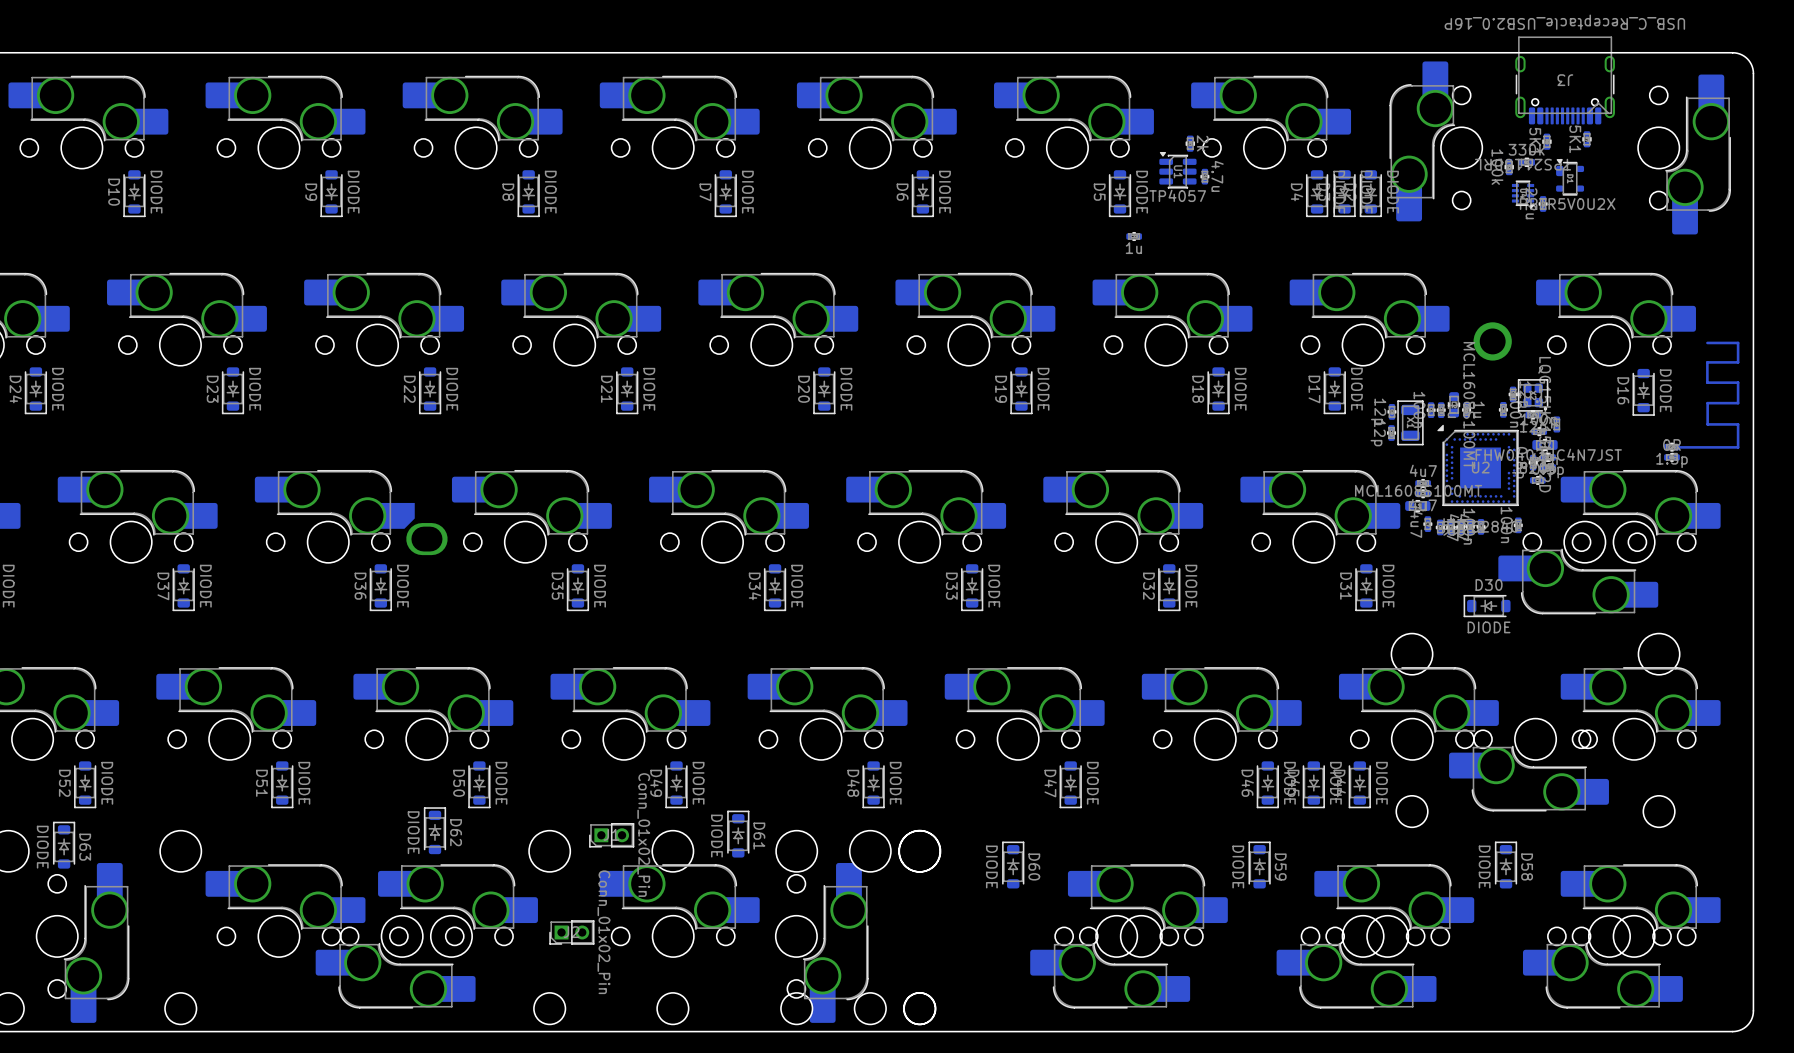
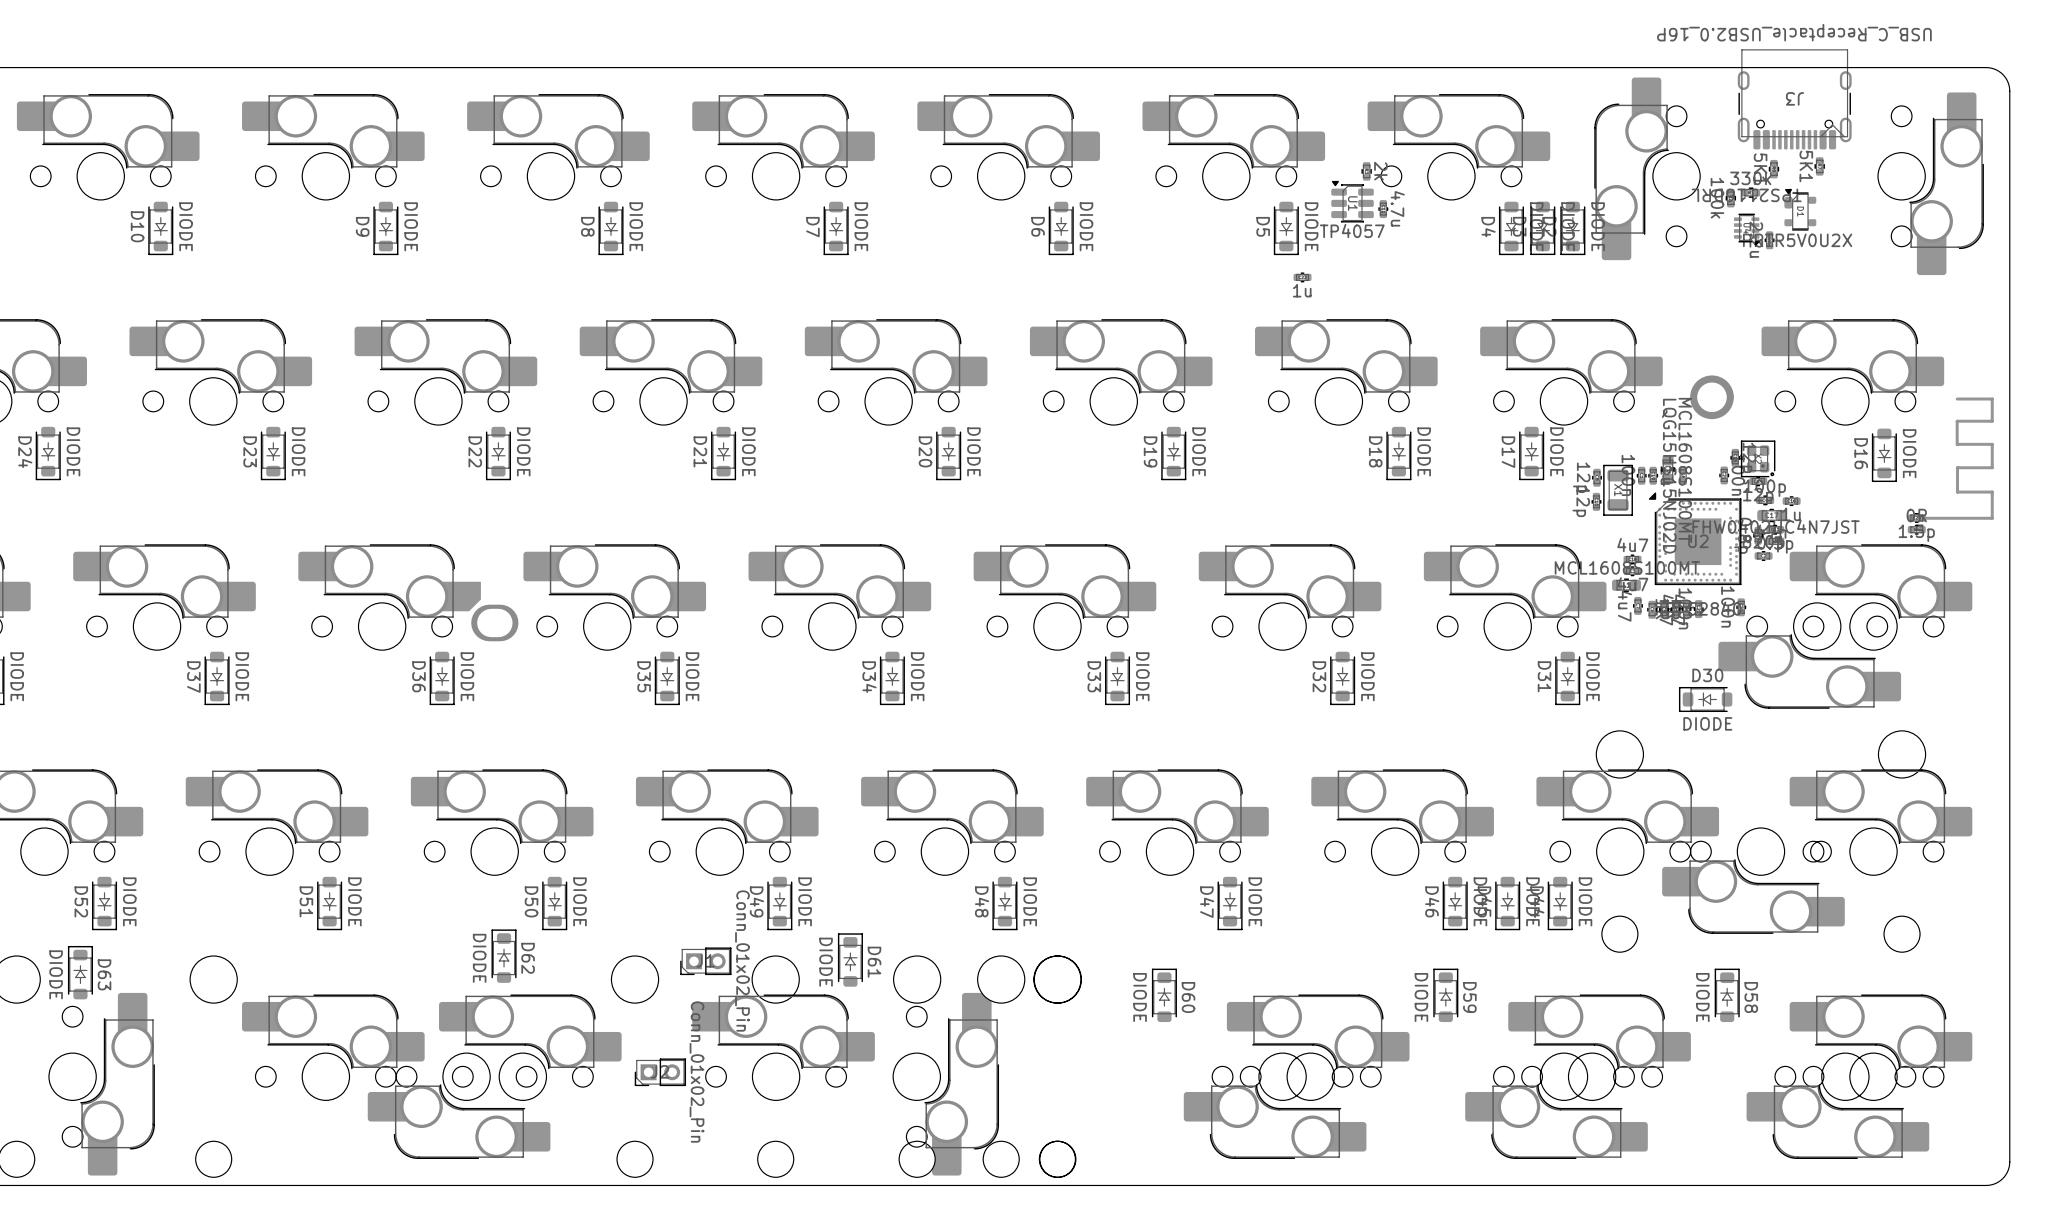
part rotation: 0° (1466, 409) -> 90° clockwise (1791, 501)
part position: (1466, 409) -> (1791, 501)
part position: (1556, 424) -> (1683, 475)

